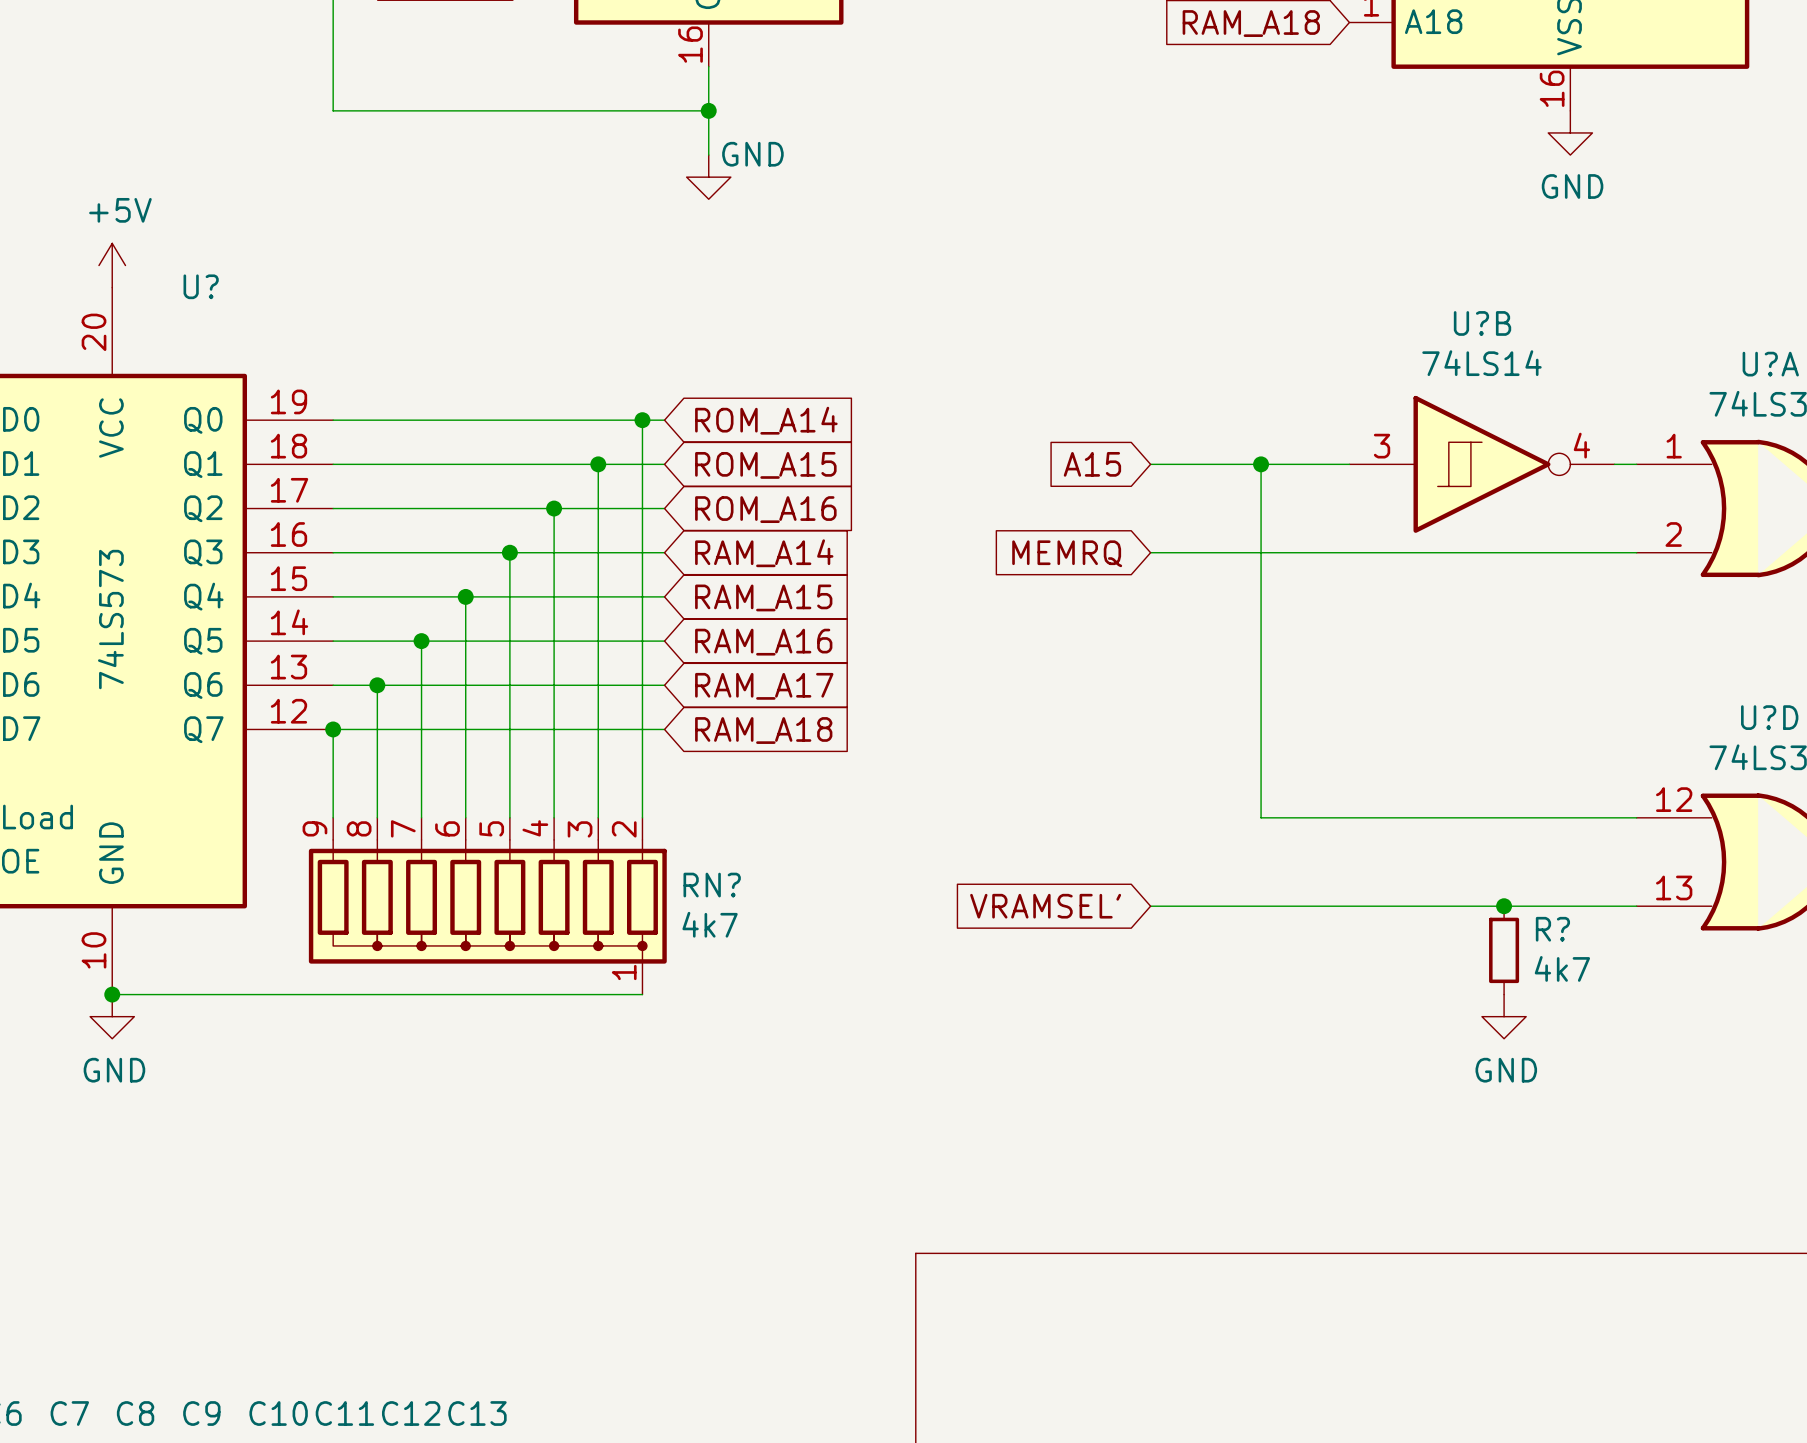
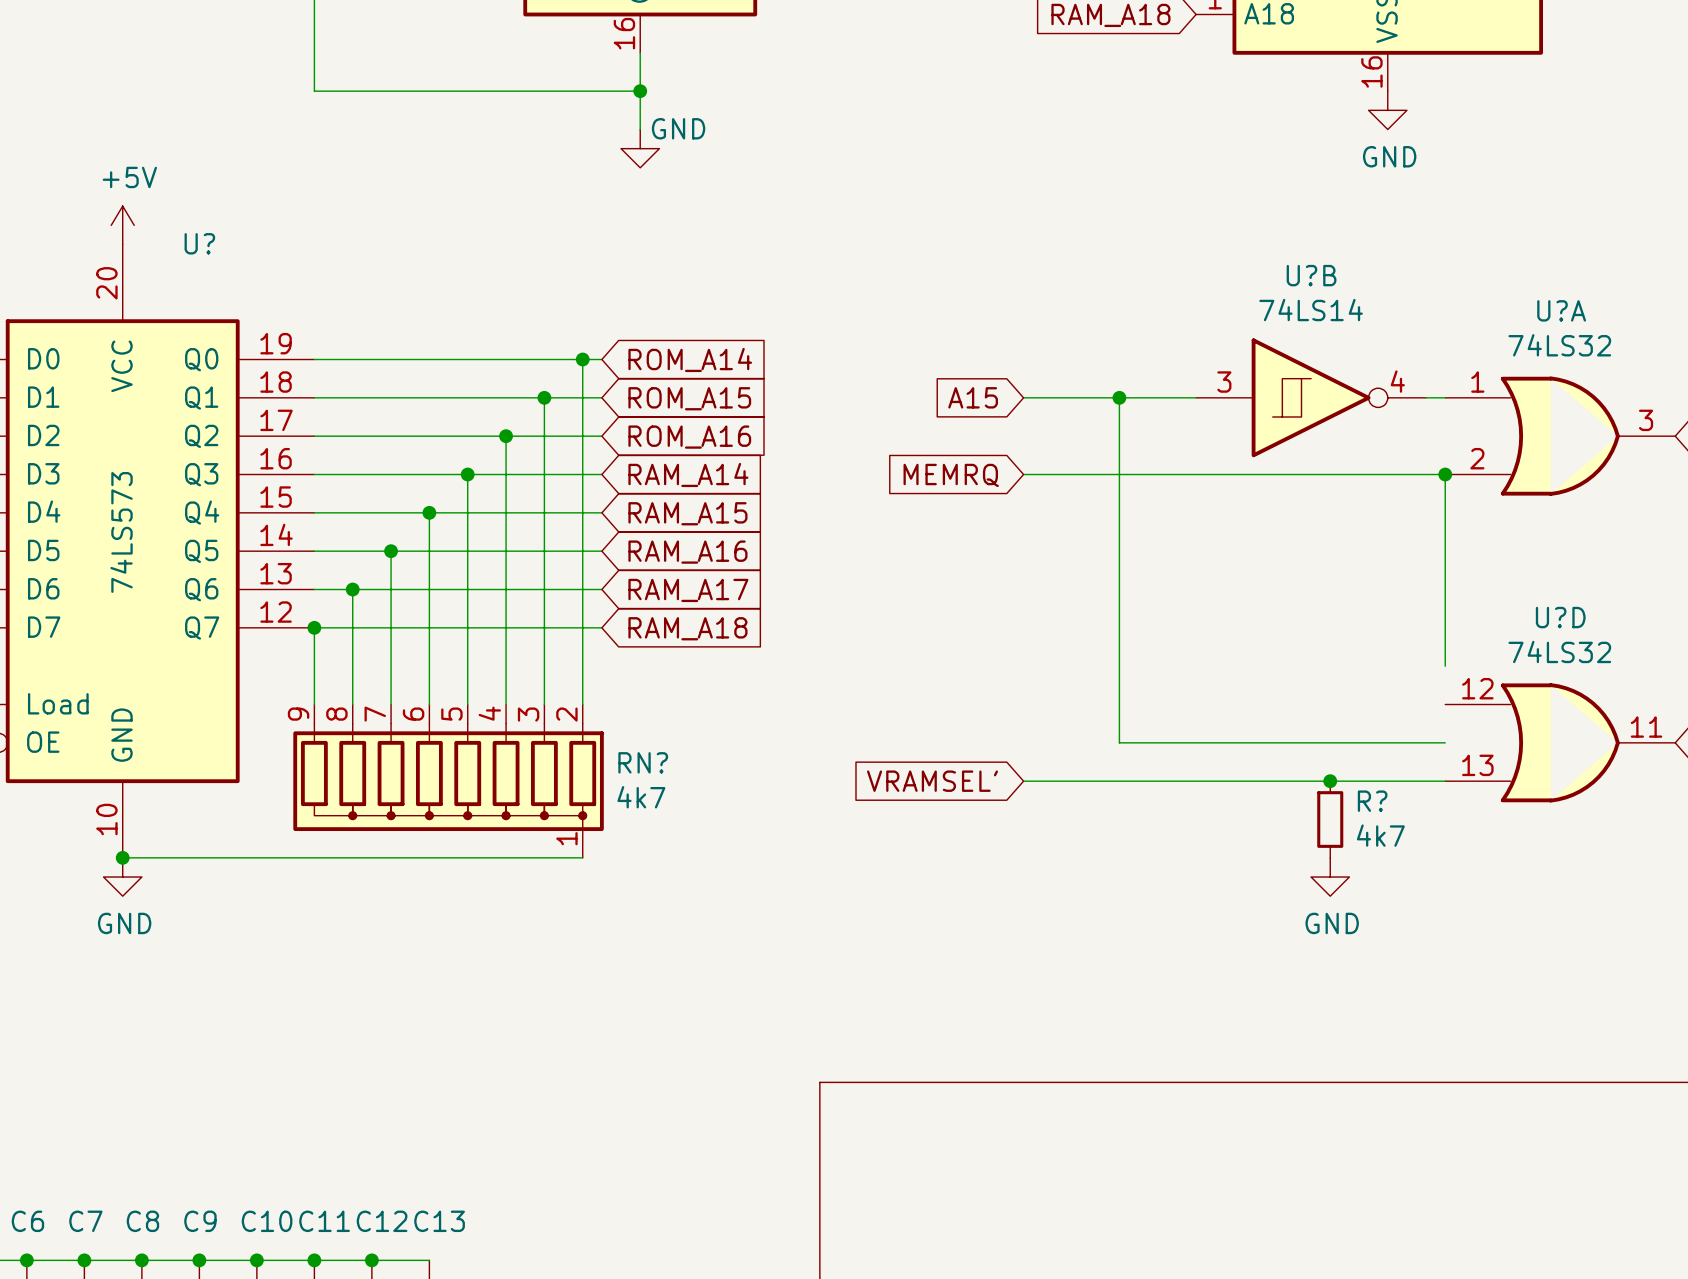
wire: none -> (1445, 474) (1445, 666)
junction: none -> (1445, 474)
wire: (1261, 817) (1636, 817) -> (1119, 704) (1119, 742) (1445, 742)

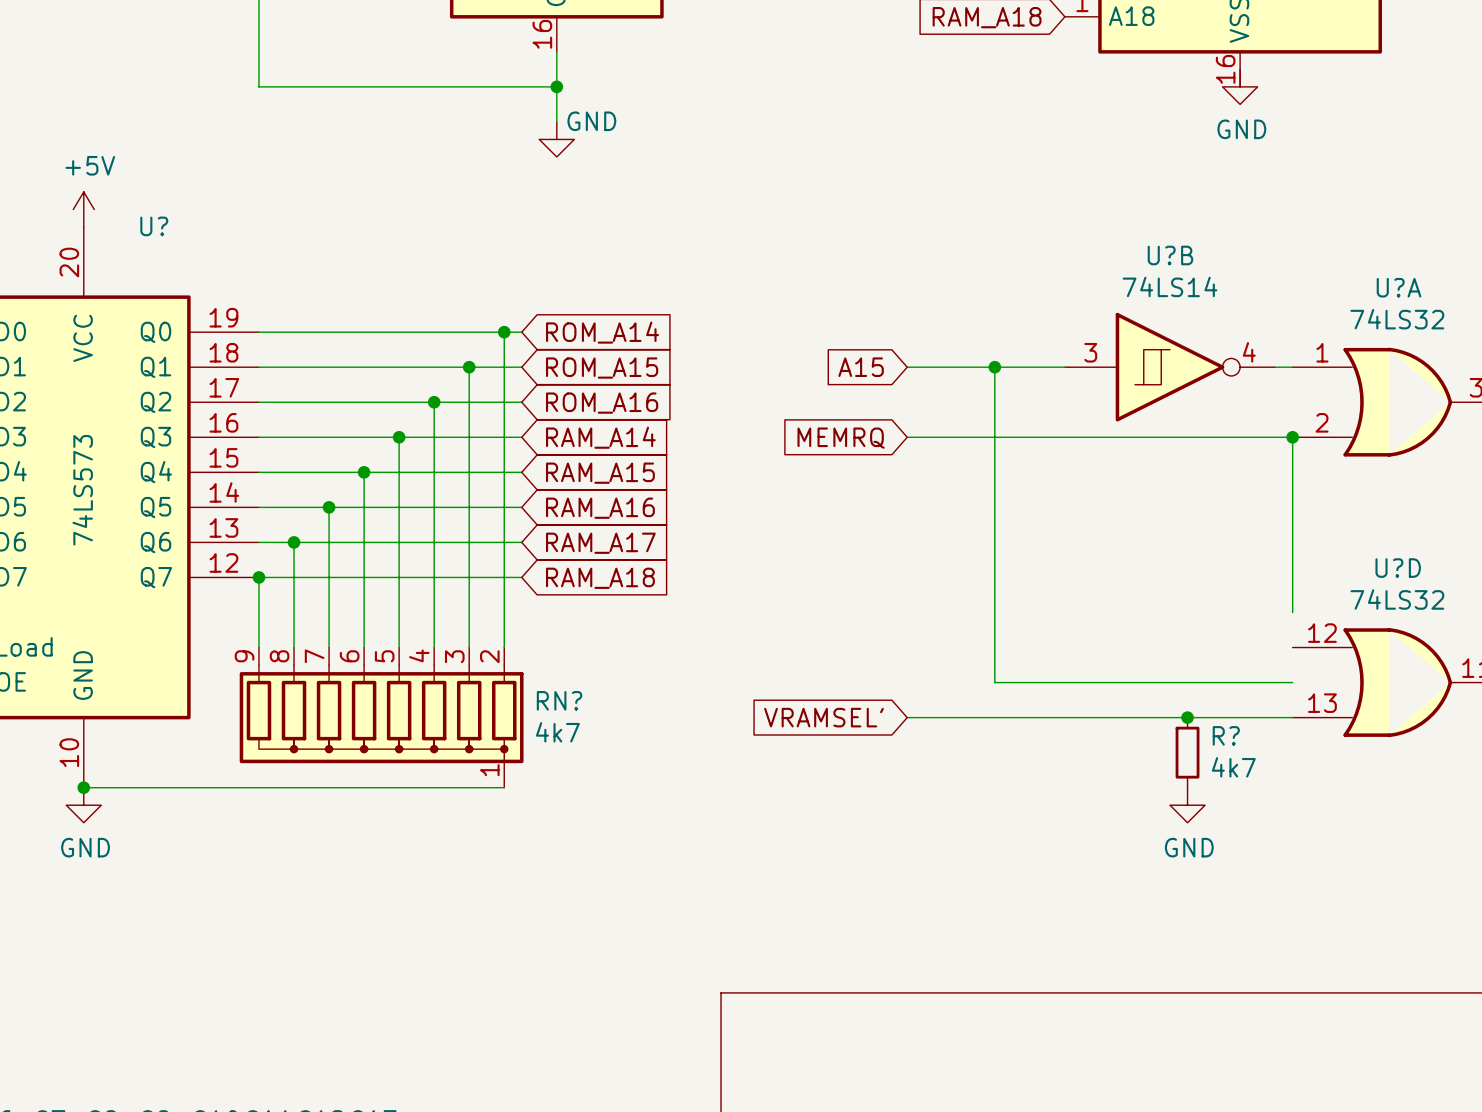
power symbol position: GND (1387, 110) -> GND (1240, 86)

